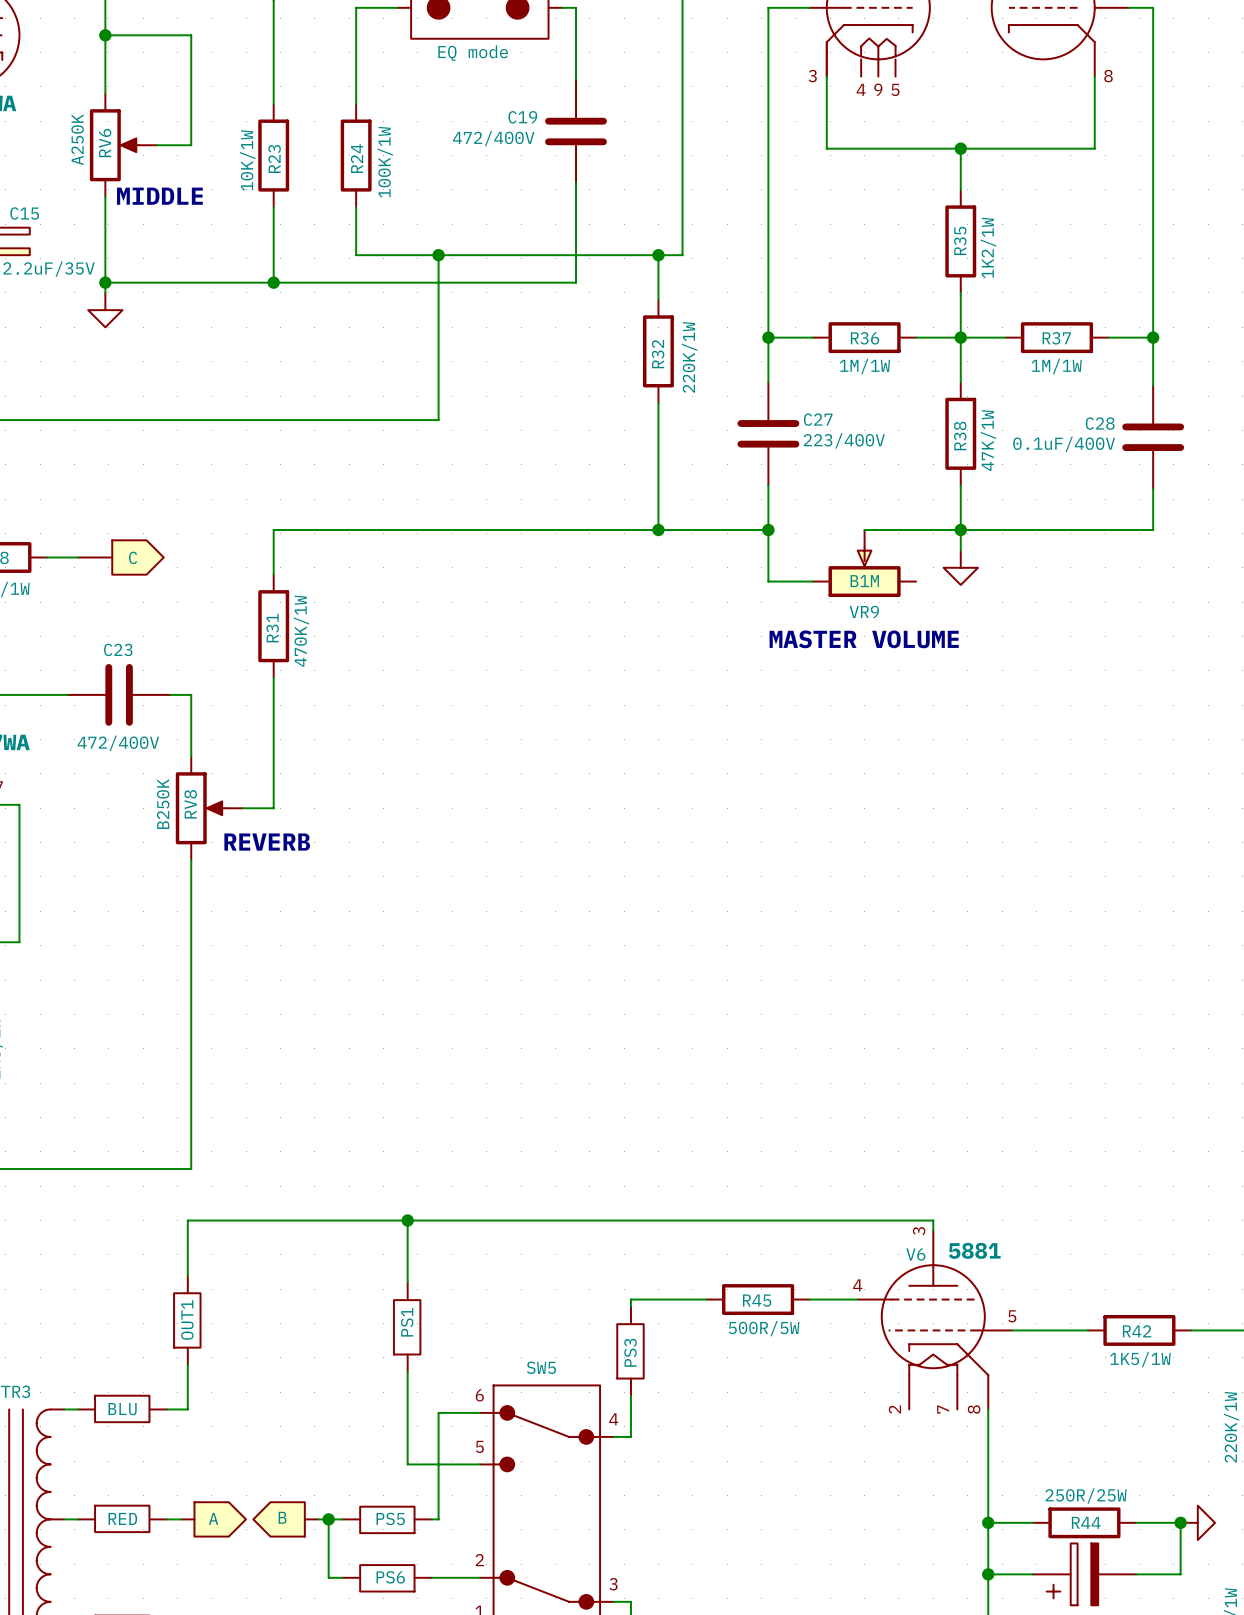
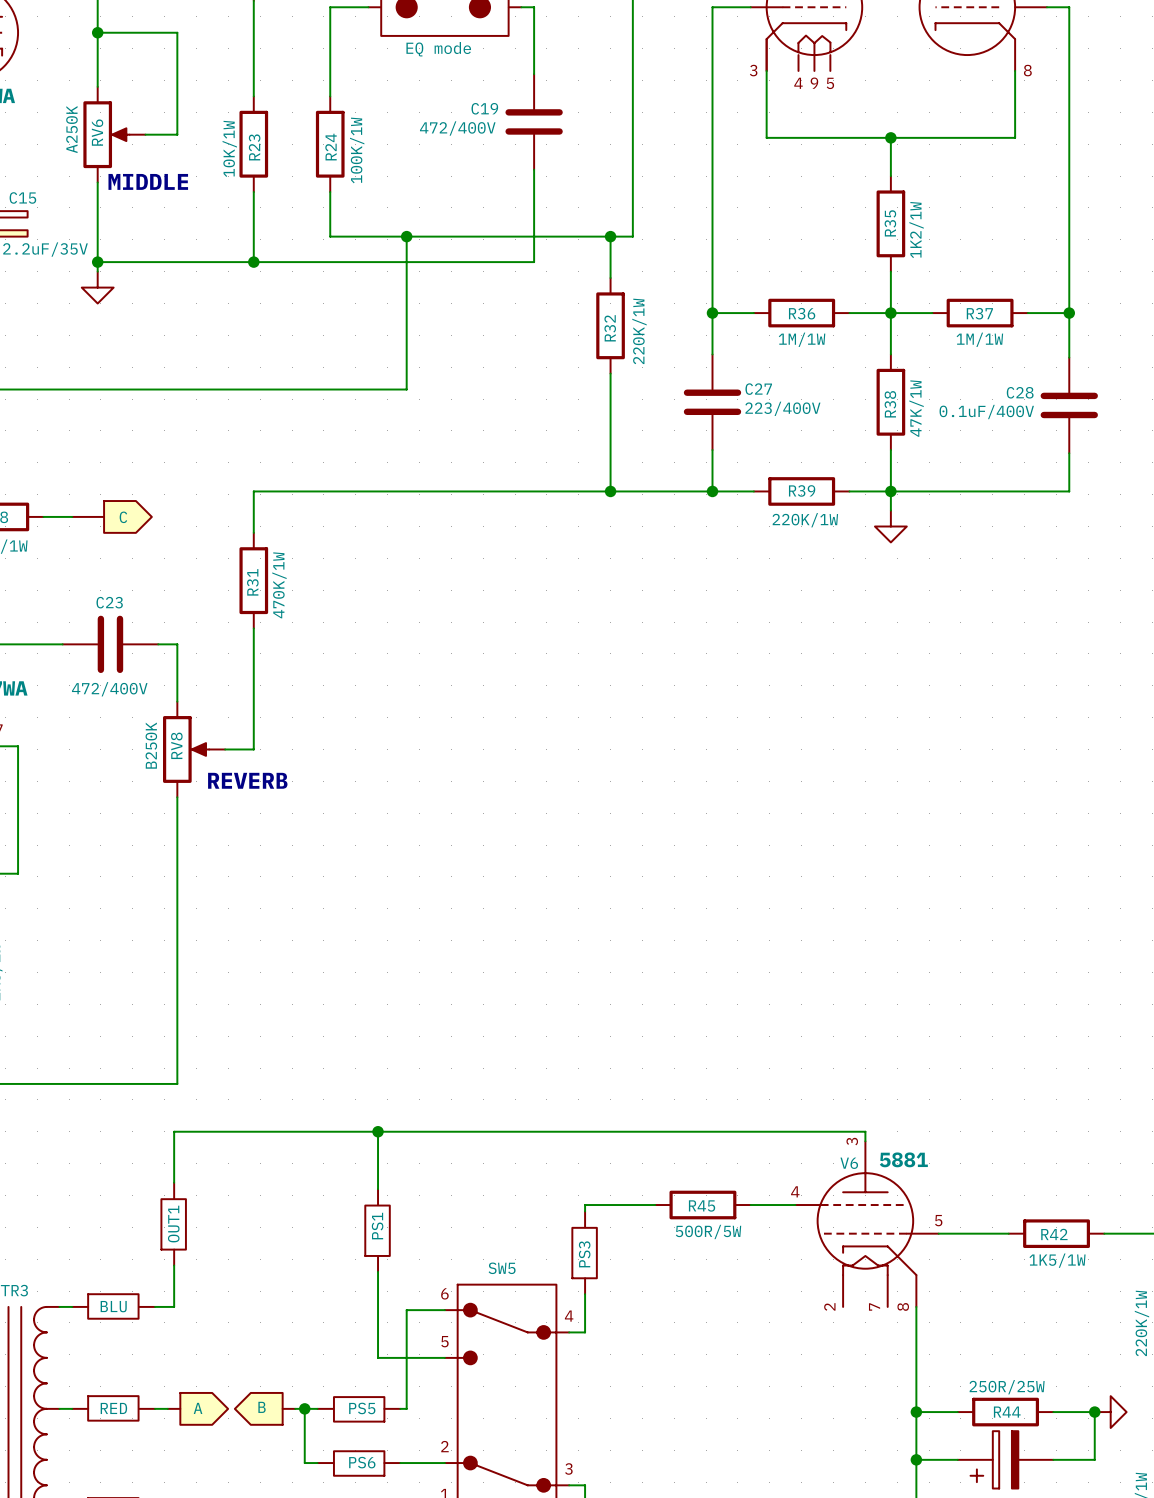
wire: (768, 530) (768, 581) (813, 581) -> (712, 491) (753, 491)
wire: (864, 530) (916, 530) -> none
R39: none -> 220K/1W (801, 491)
VR9: B1M (864, 563) -> none
text: MASTER VOLUME (864, 639) -> none

